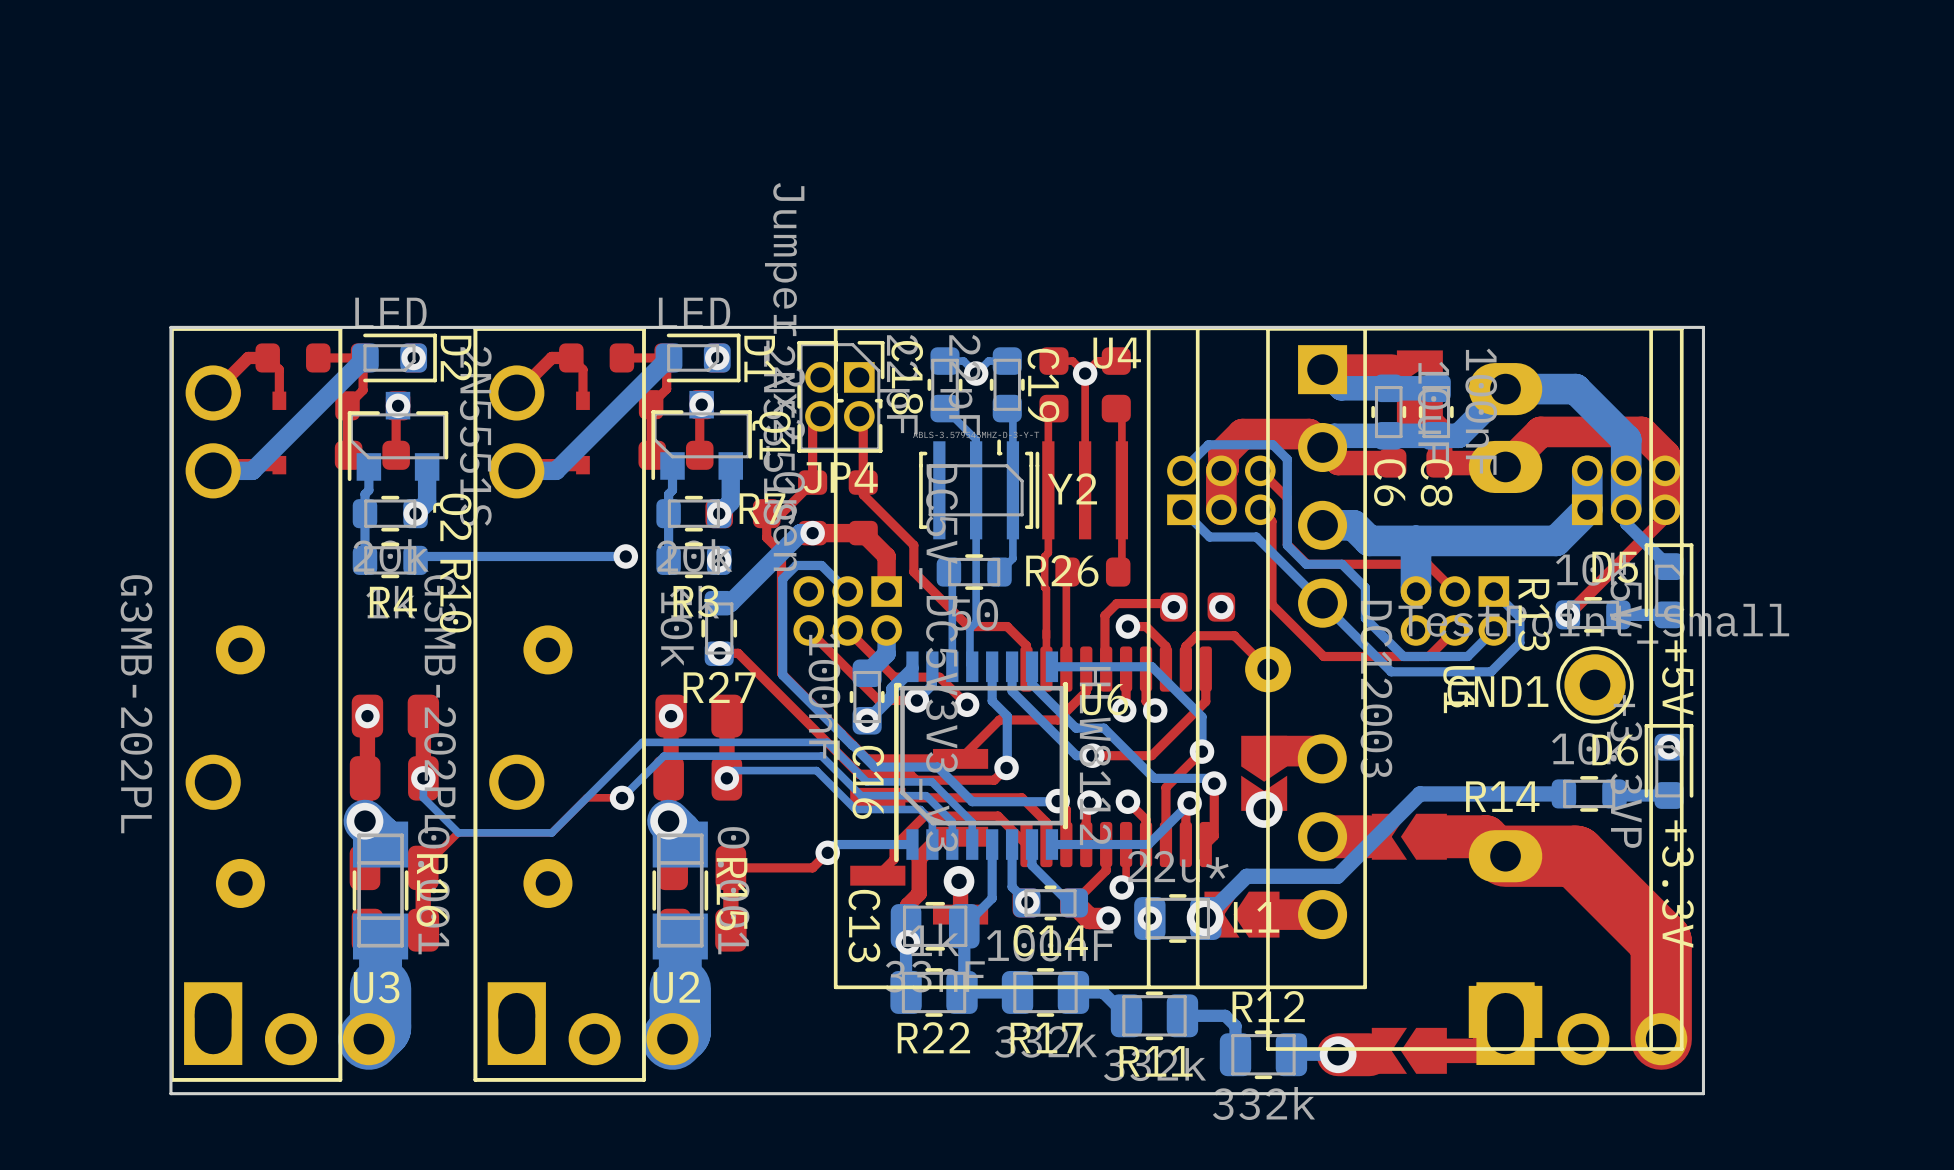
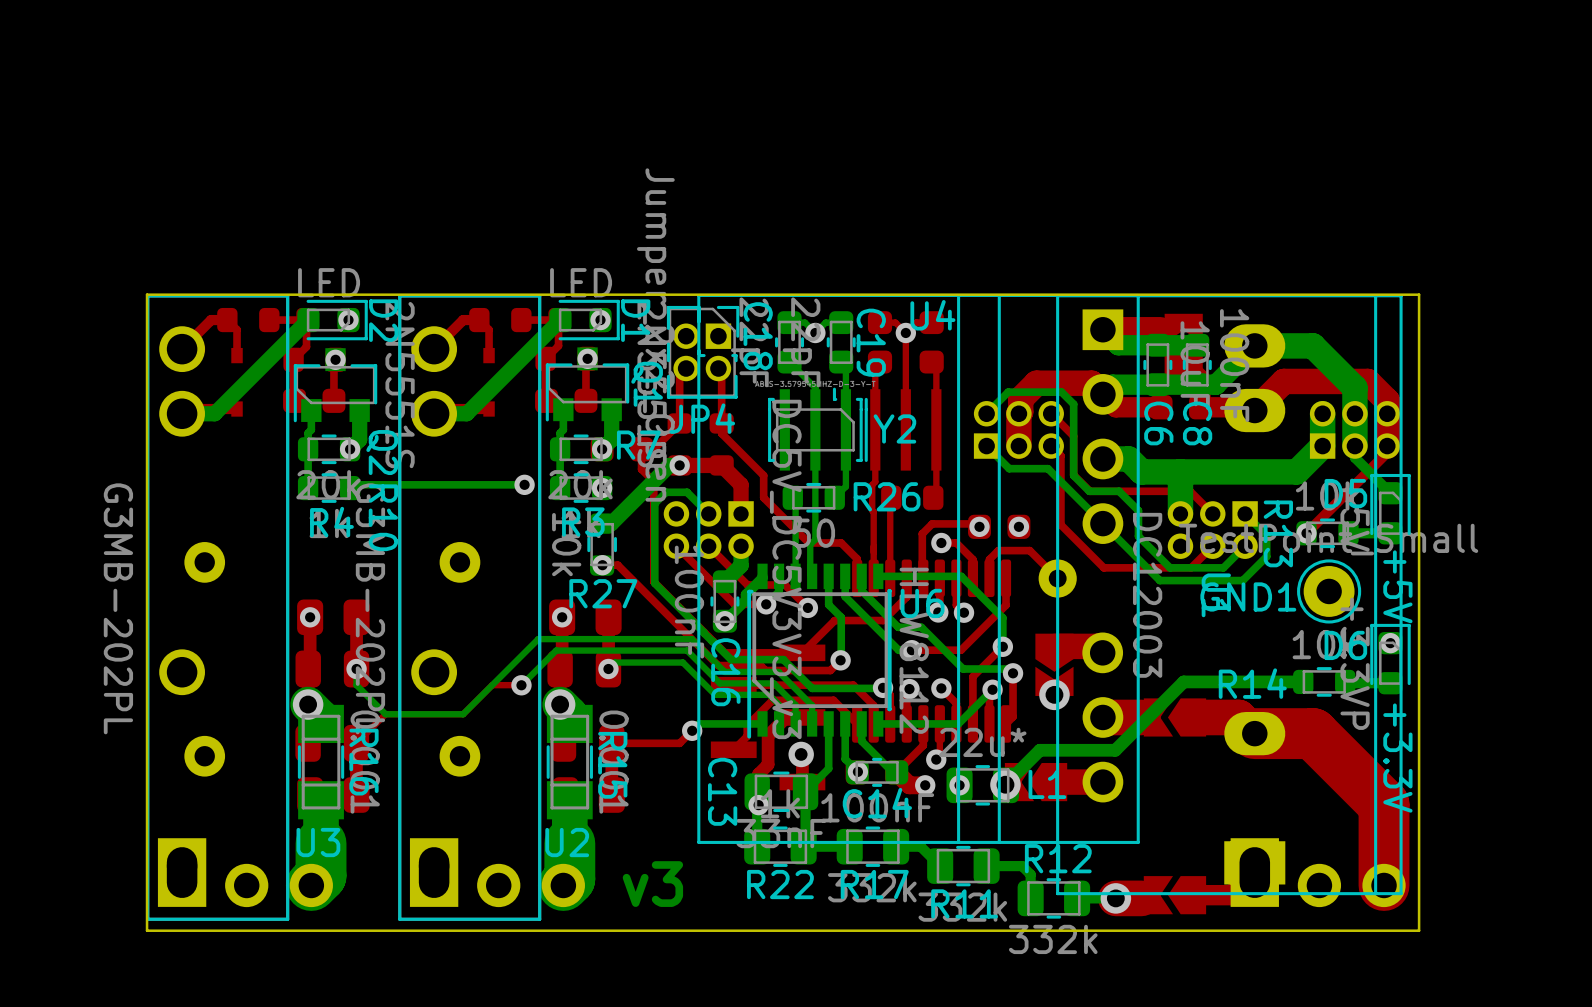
text: none -> v3 (652, 884)

